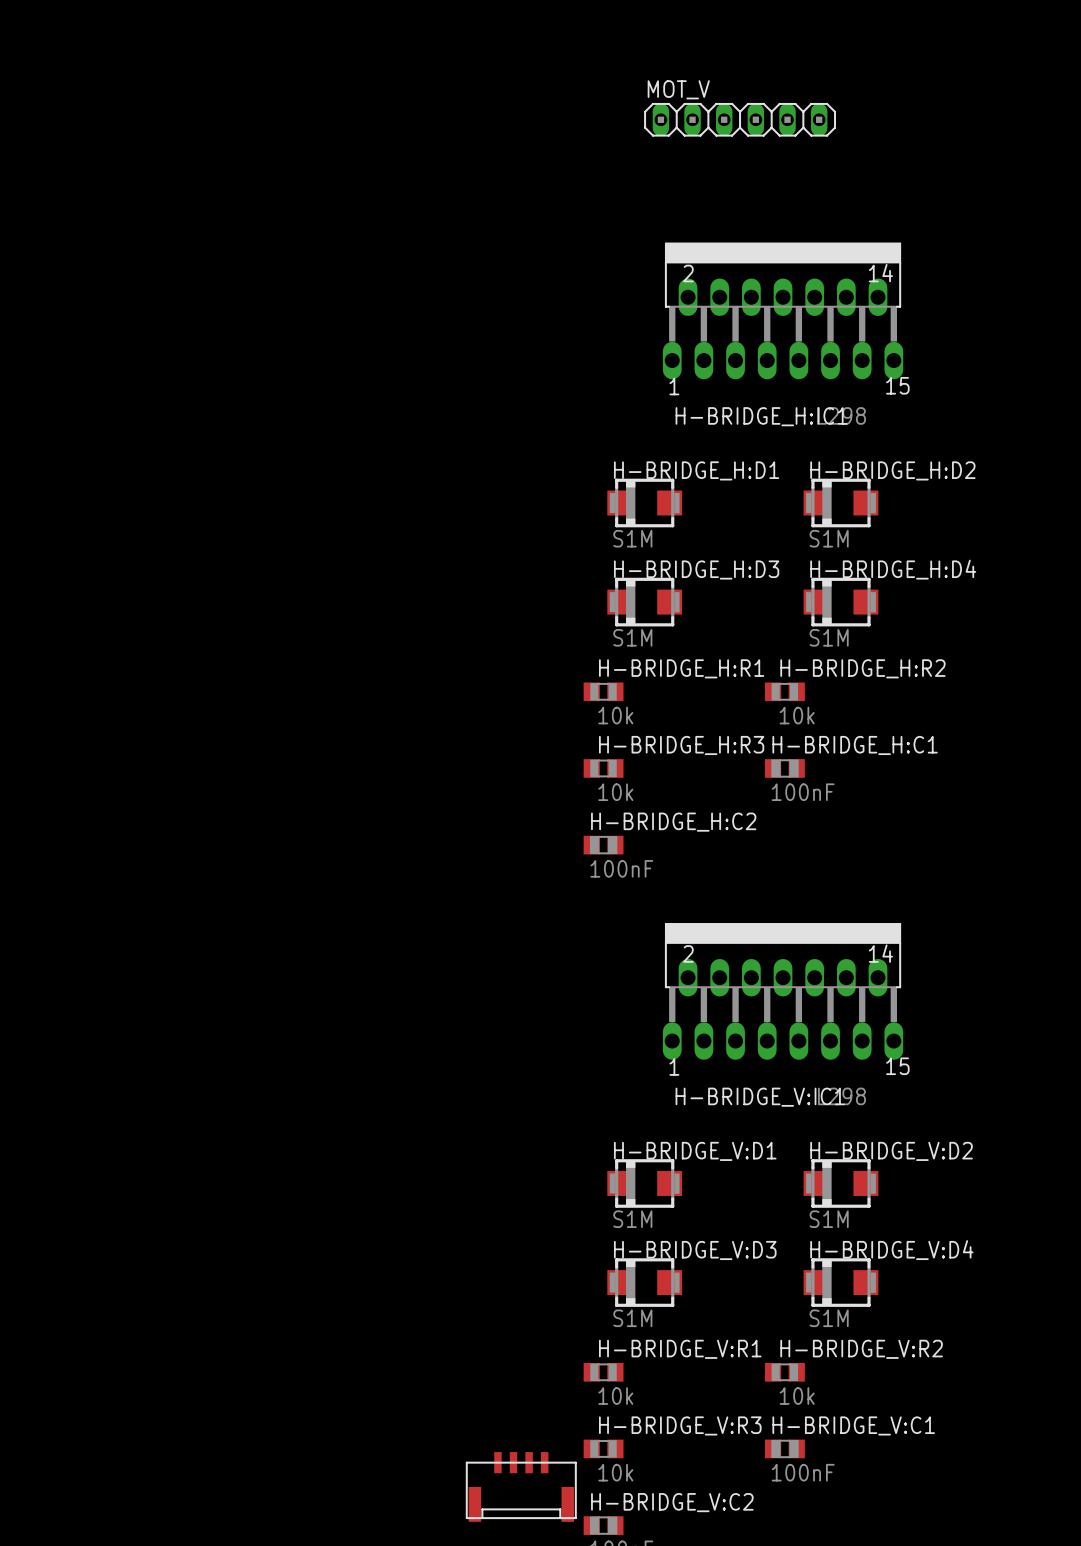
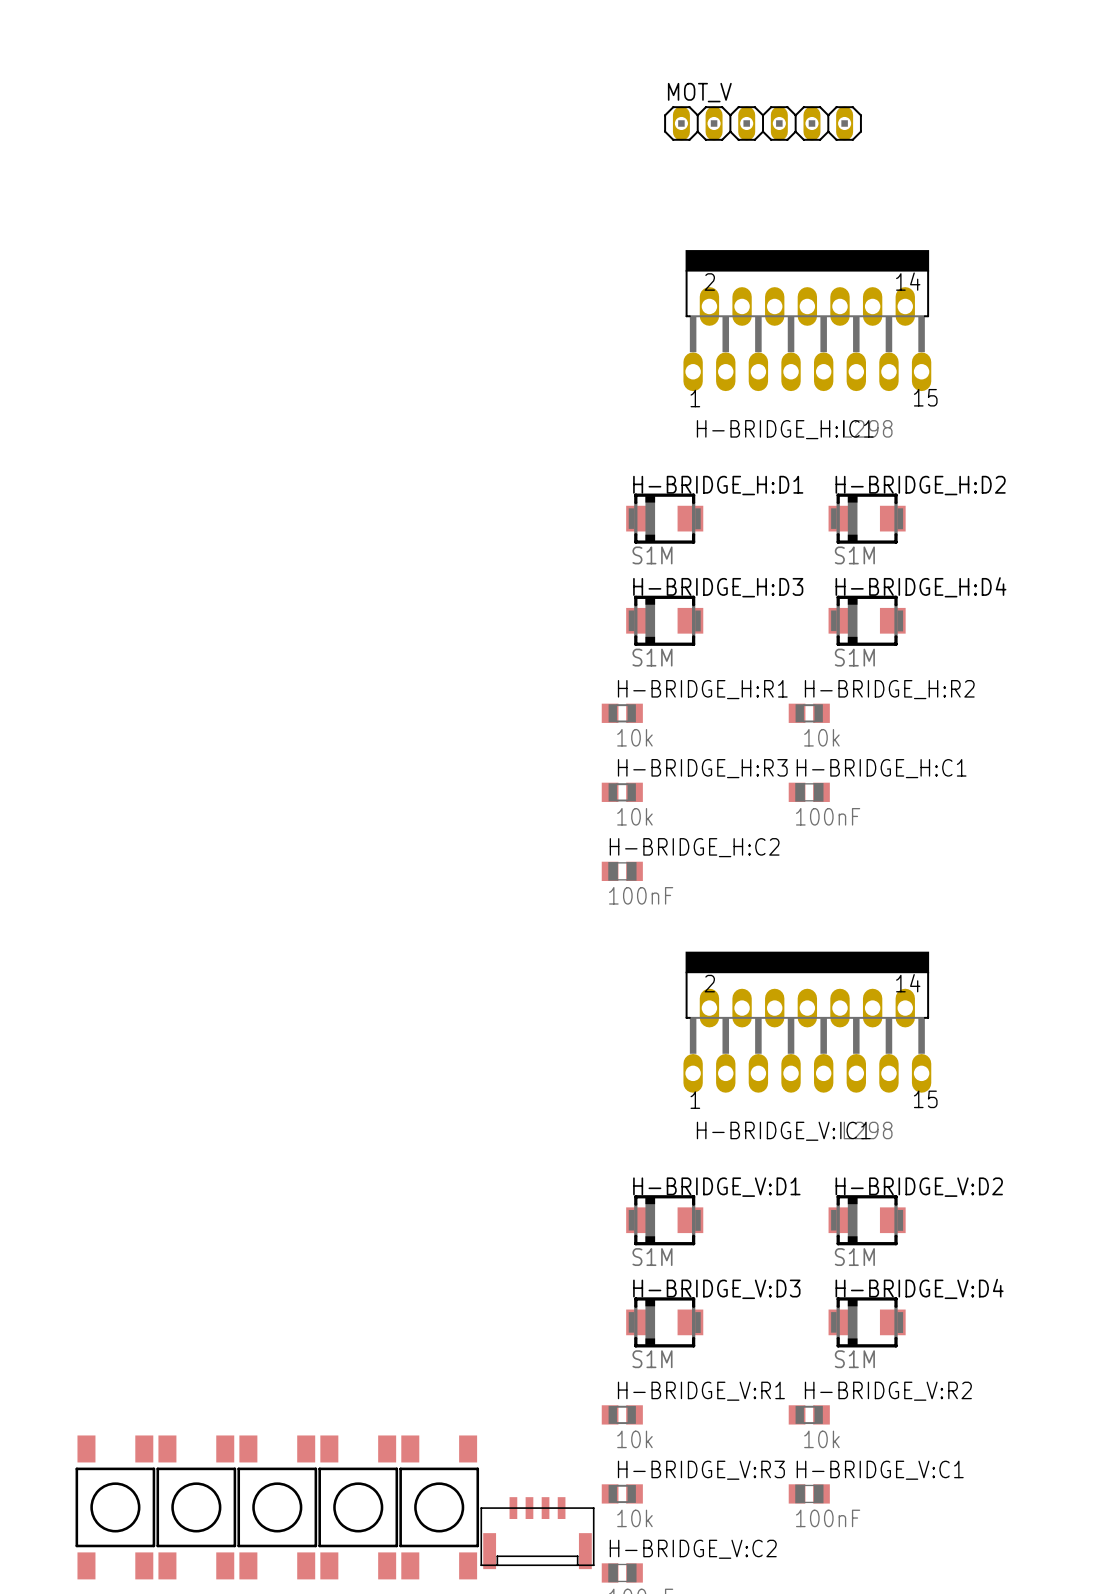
part: none -> (115, 1507)
part: none -> (196, 1507)
part: none -> (277, 1507)
part: none -> (358, 1507)
part: none -> (439, 1507)

